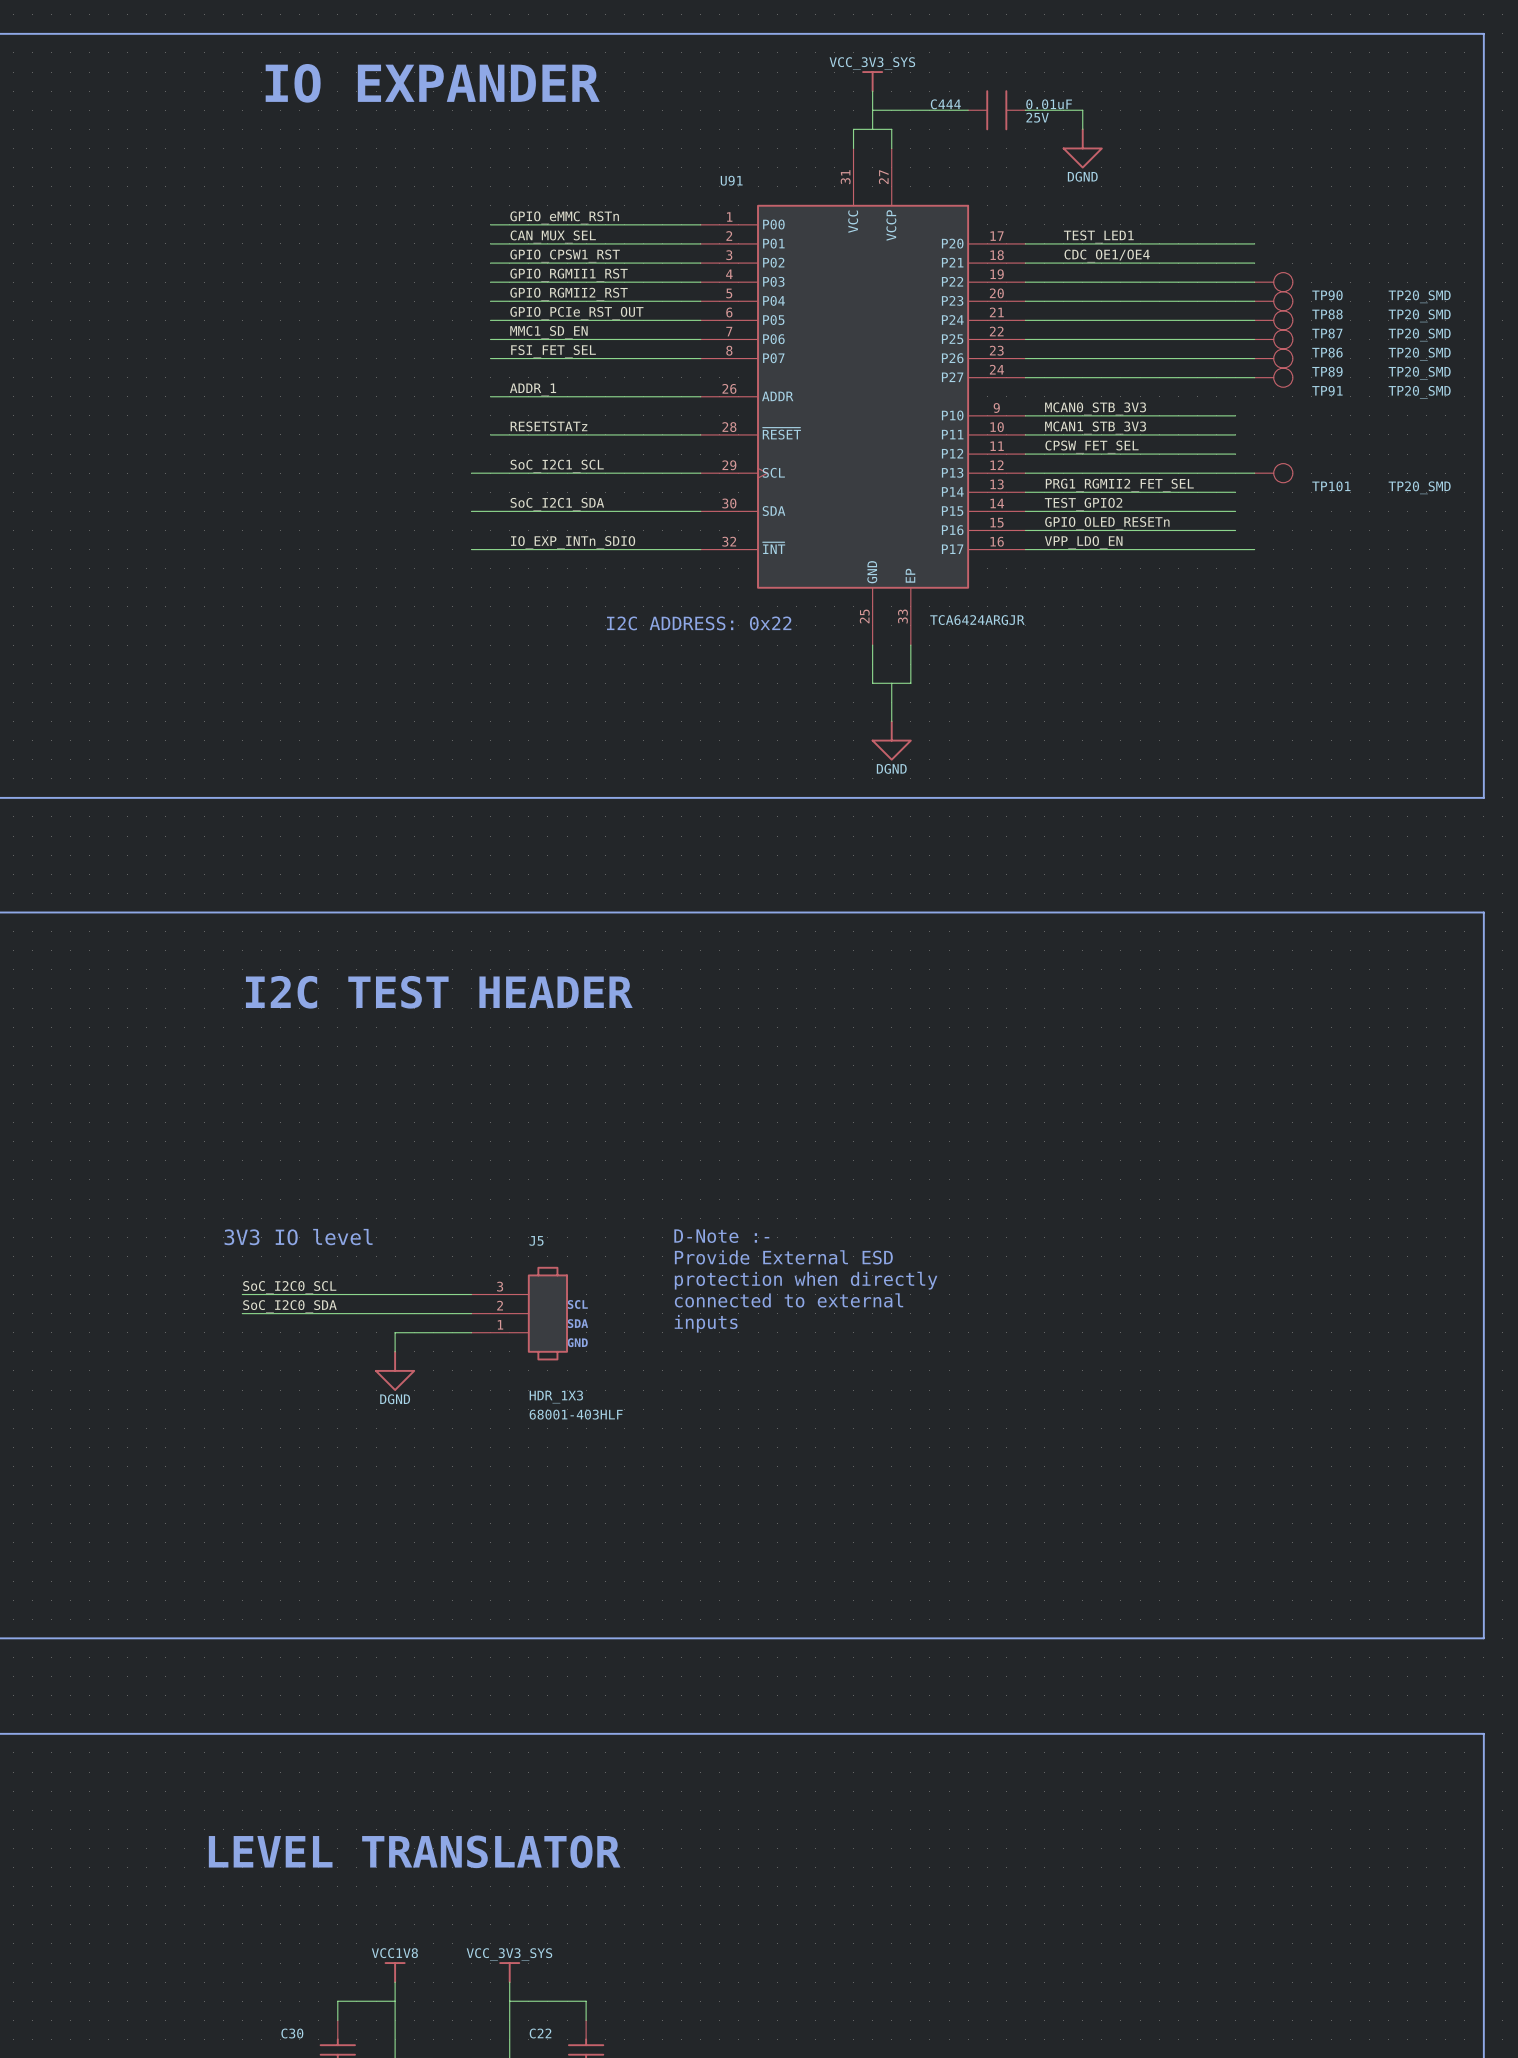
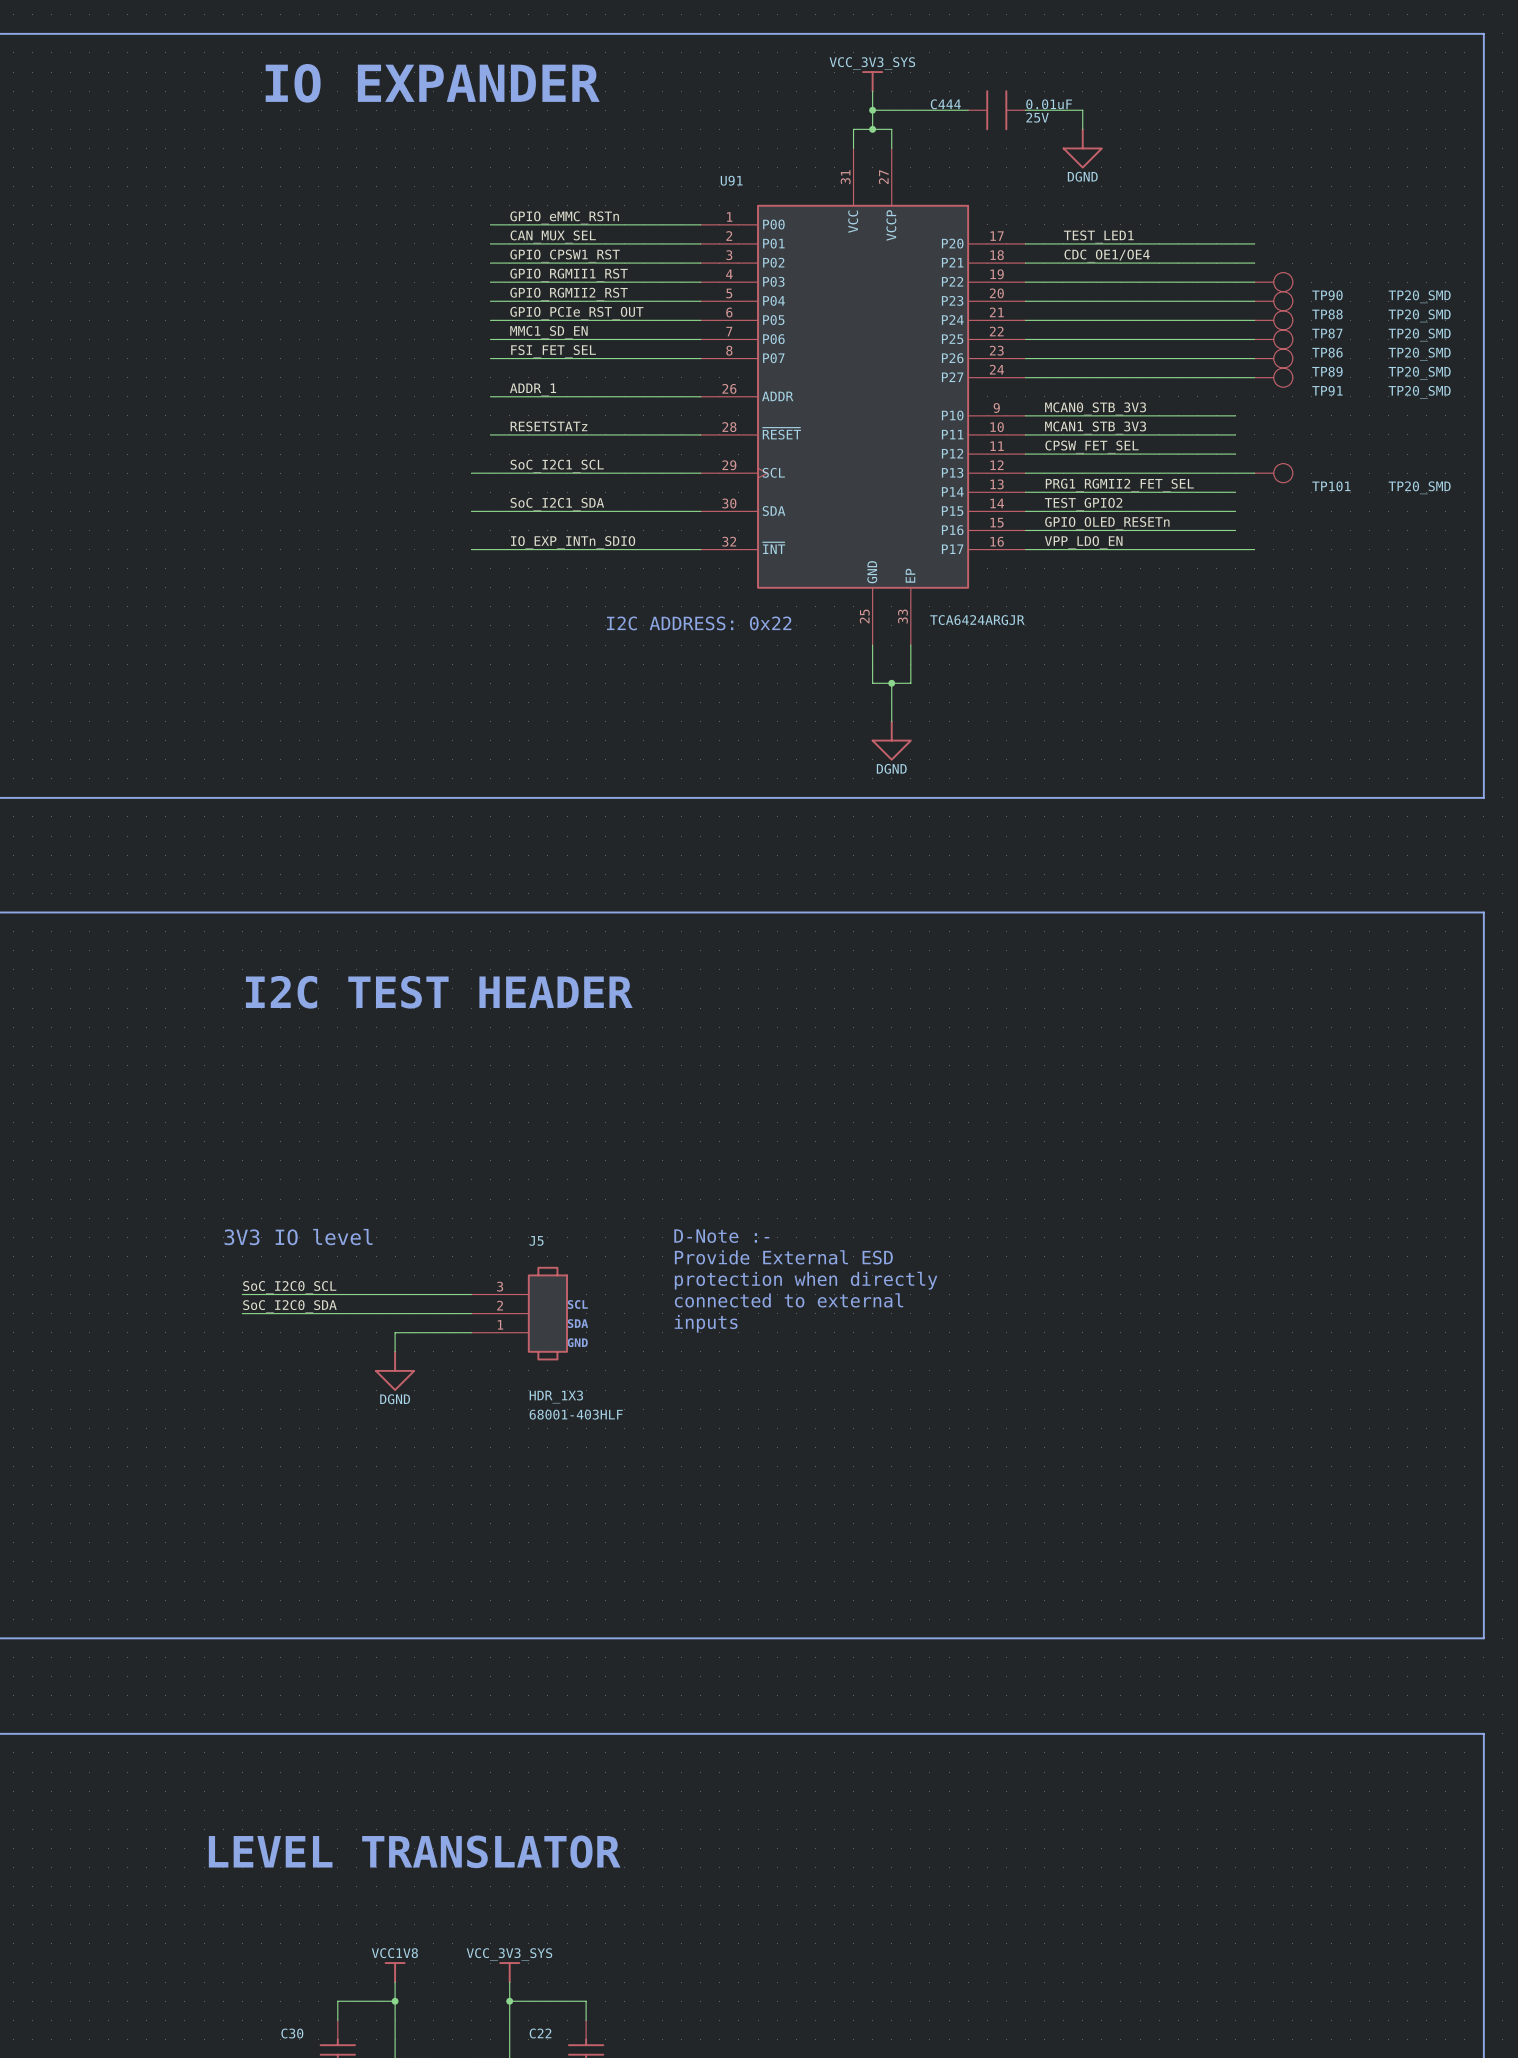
junction: none -> (872, 110)
junction: none -> (872, 129)
junction: none -> (891, 683)
junction: none -> (395, 2001)
junction: none -> (509, 2001)

